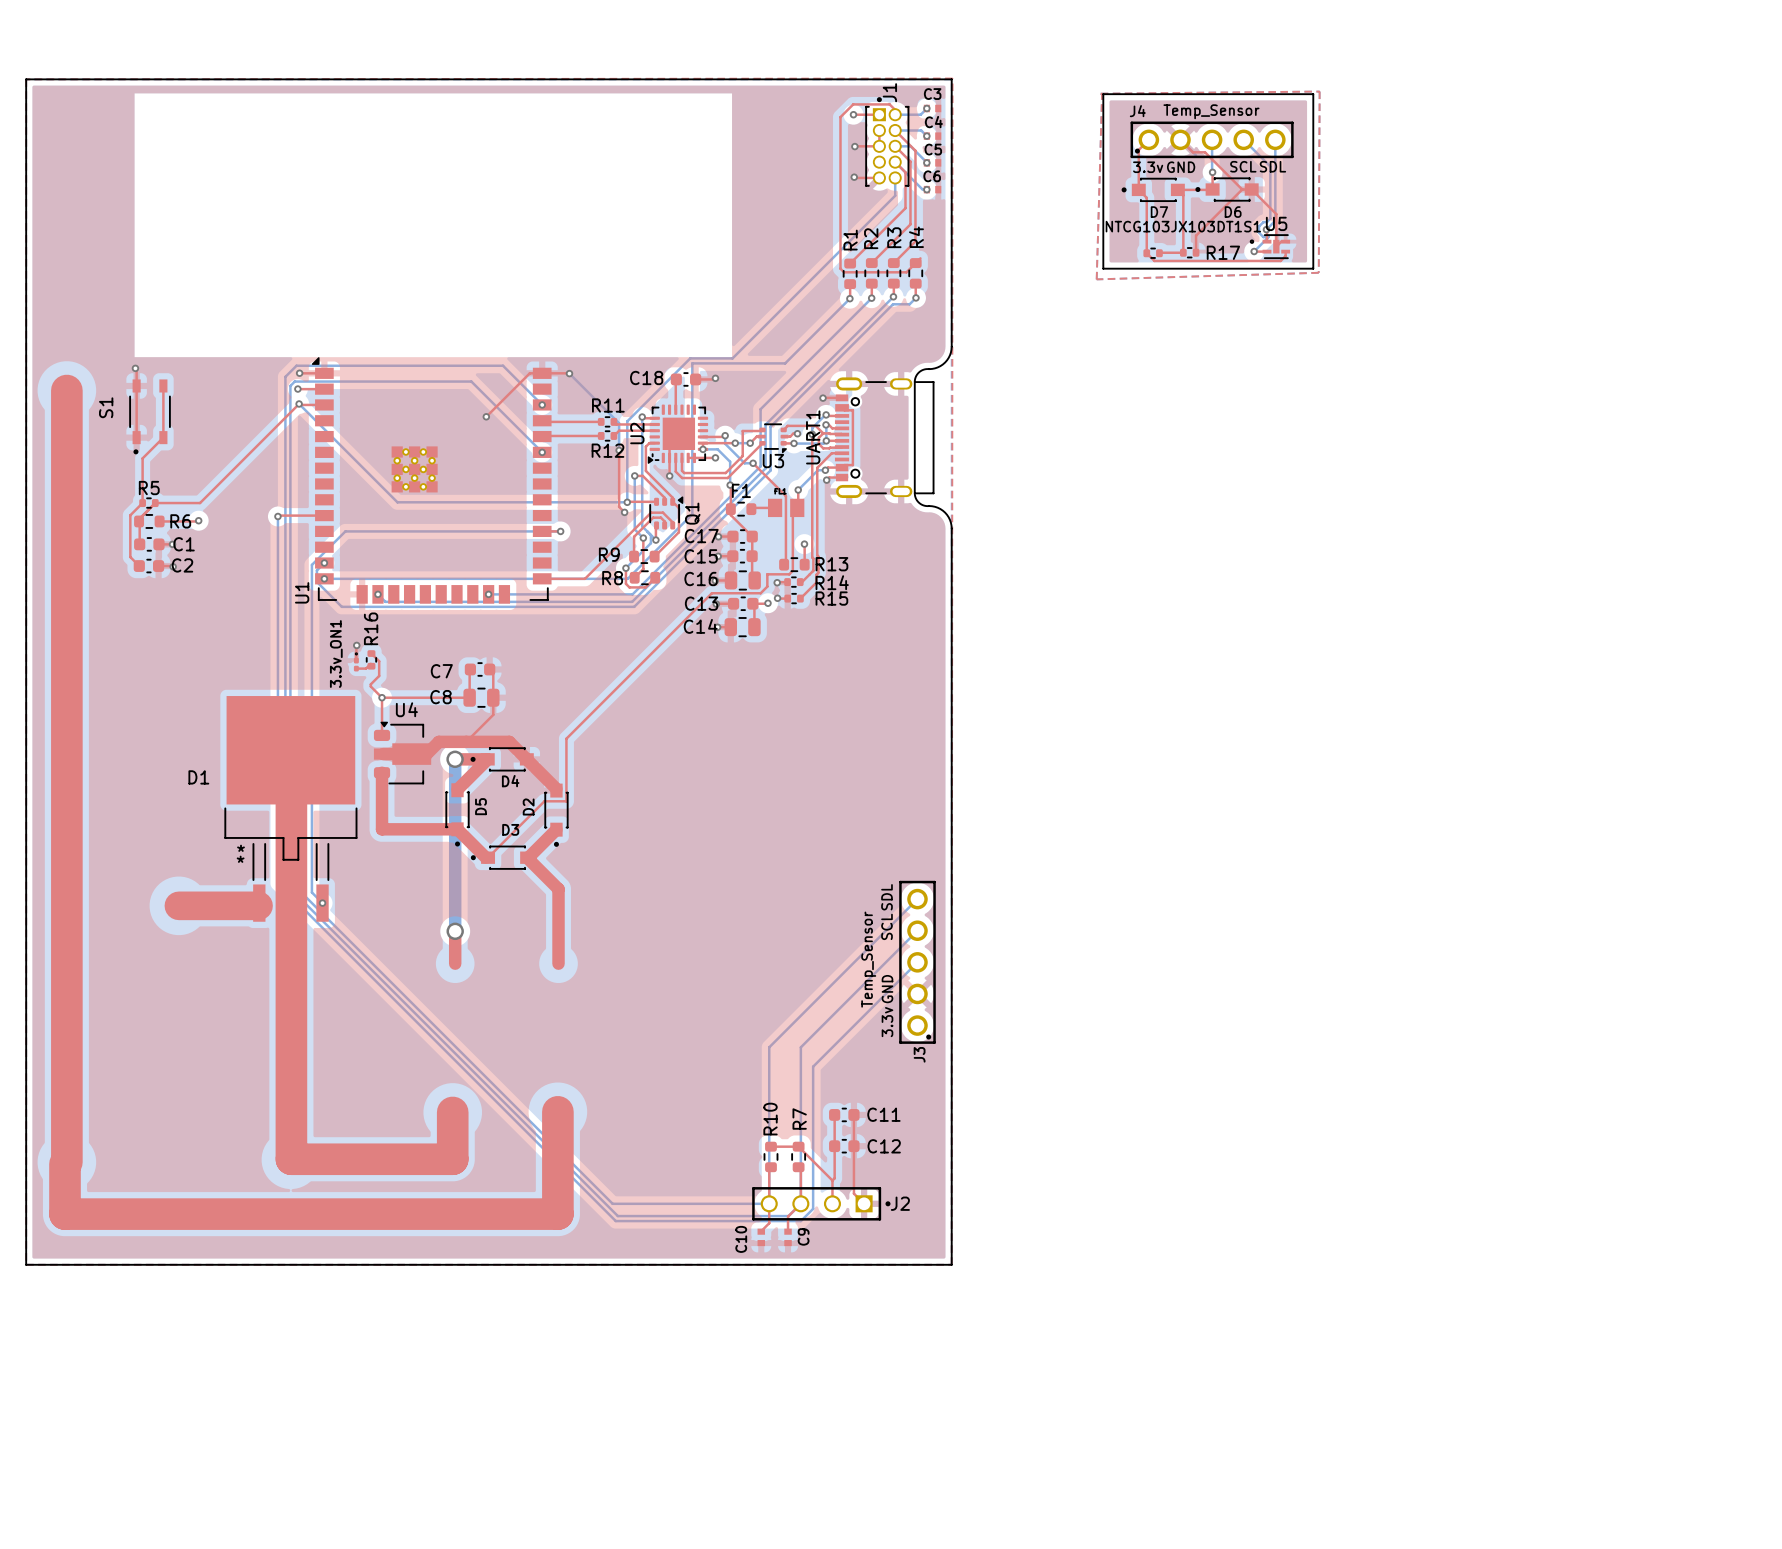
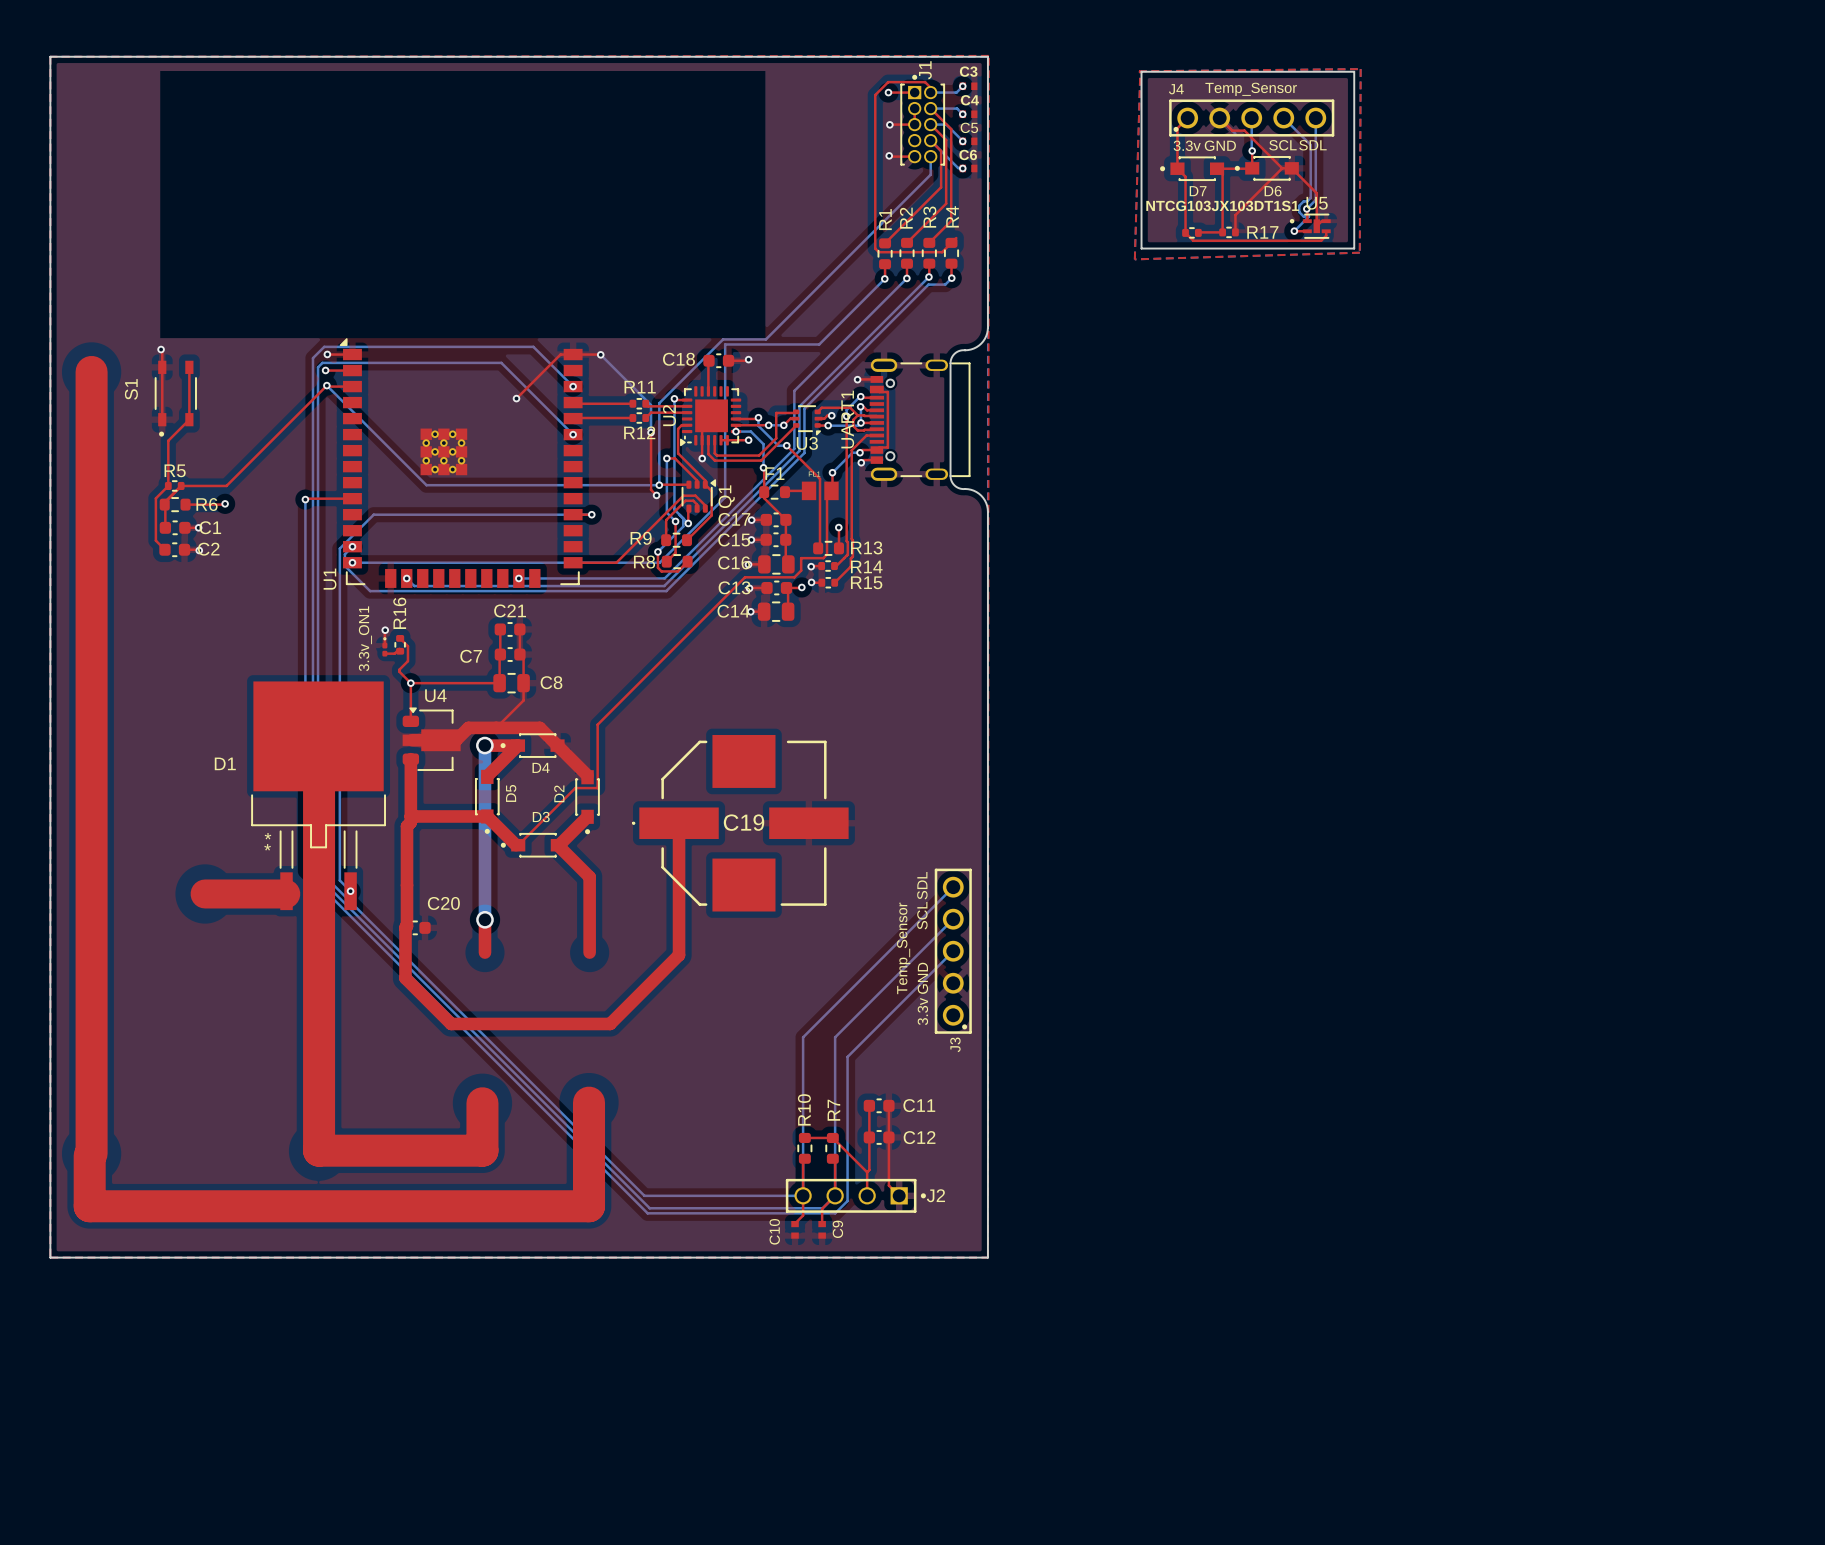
top track: none -> (500, 629) (500, 654)
C21: none -> (510, 629)
top track: none -> (519, 629) (519, 654)
C8 name position: C8 (441, 697) -> C8 (551, 682)
top track: none -> (410, 816) (410, 822) (407, 826) (405, 978) (451, 1023) (610, 1023) (679, 955) (679, 823)
C19: none -> (740, 823)
C20: none -> (415, 927)

